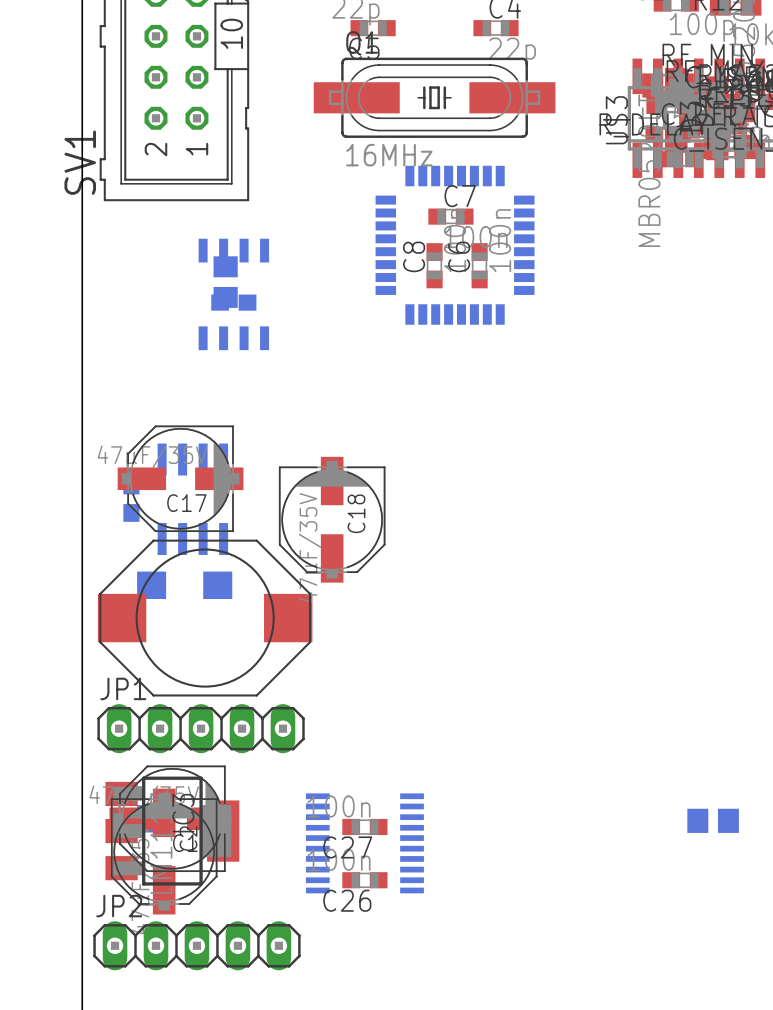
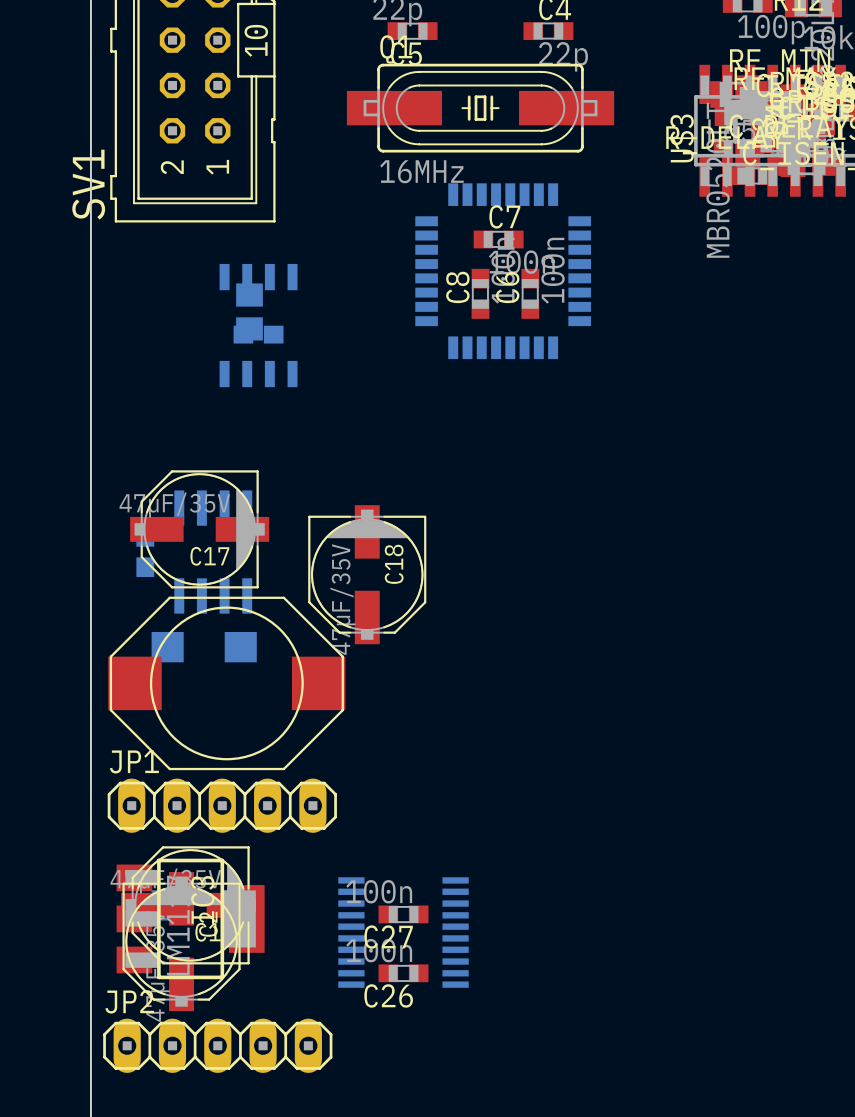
part: (713, 820) -> none

